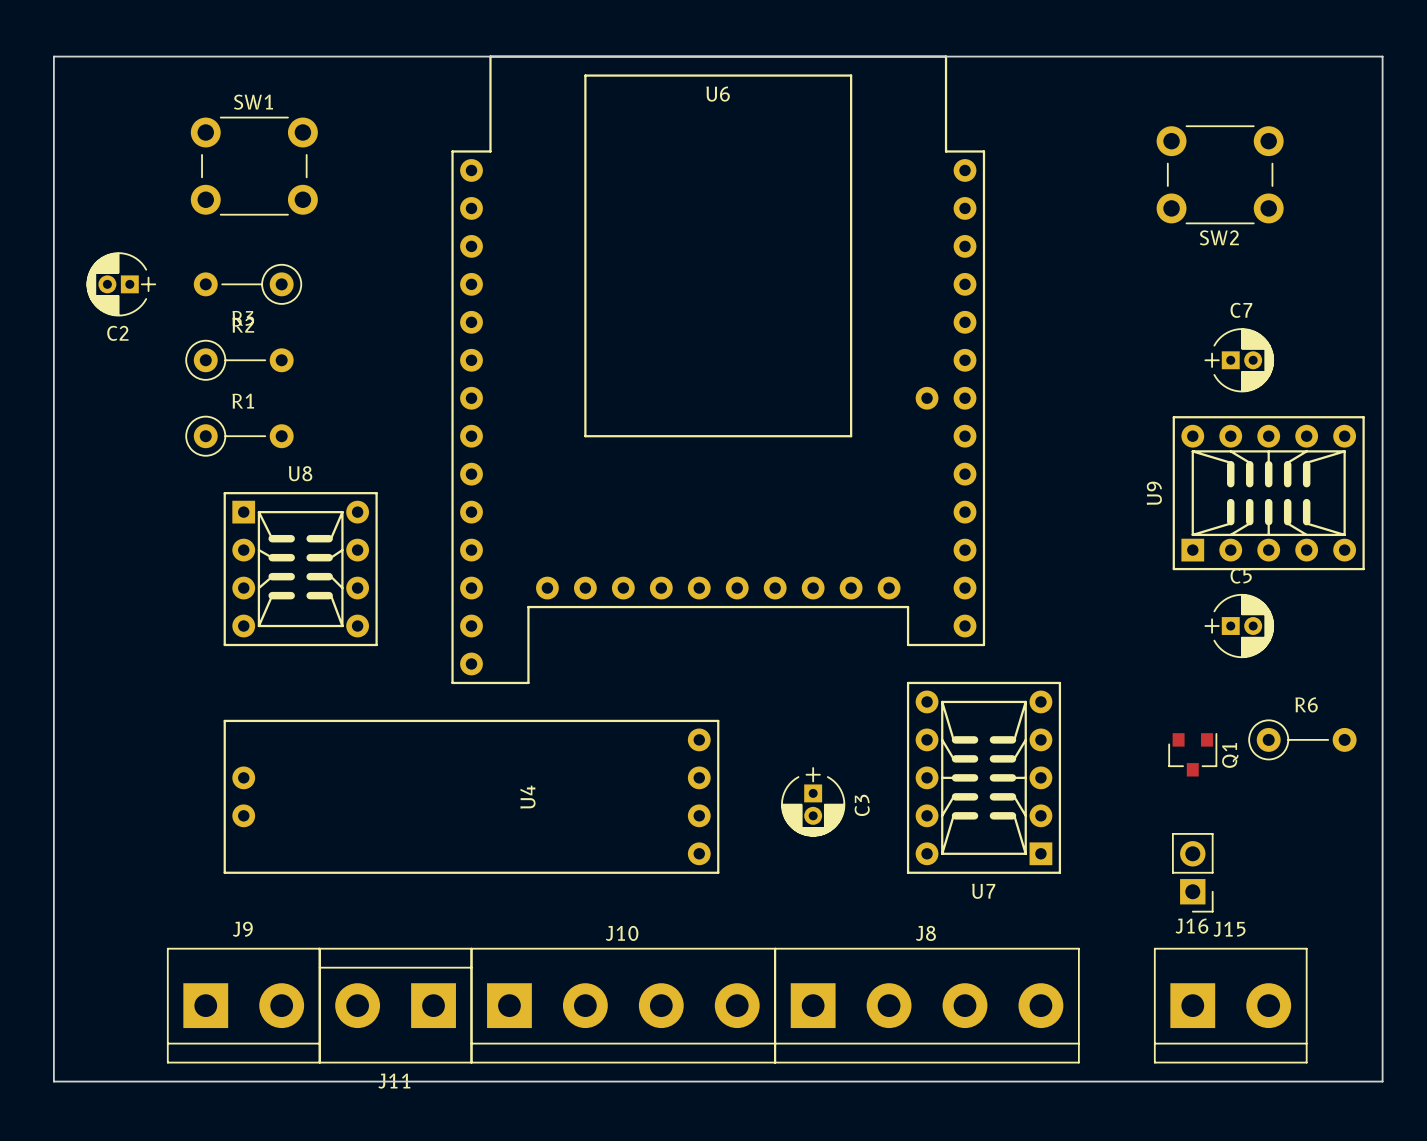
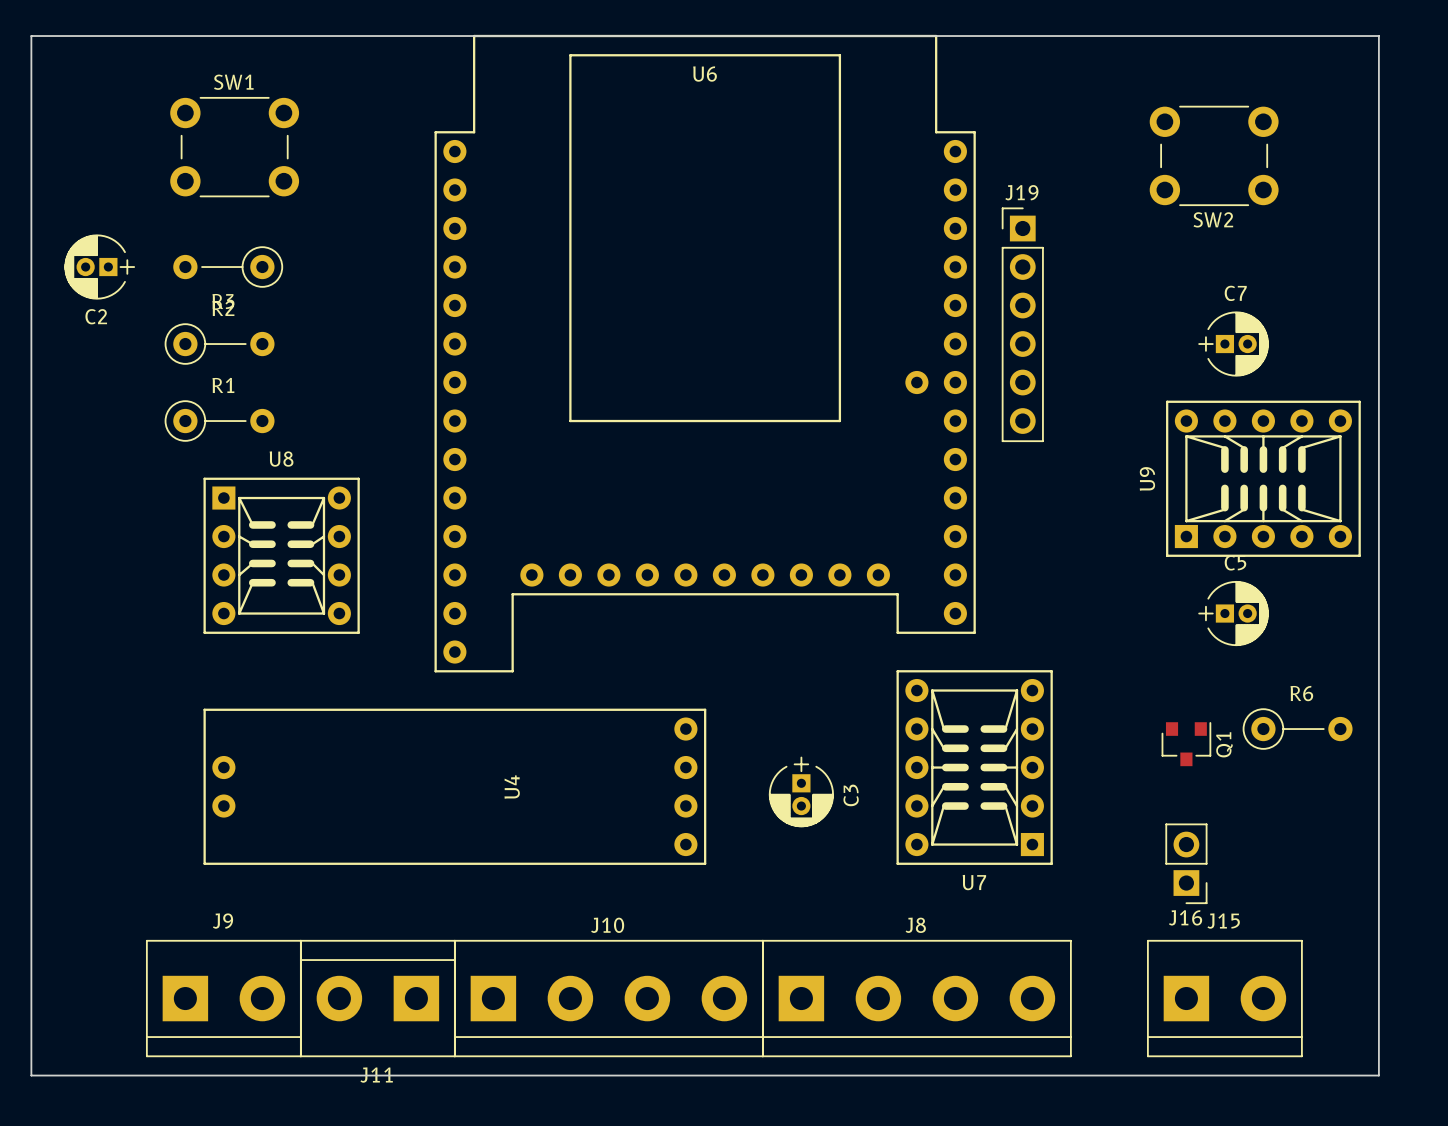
J19: none -> (1022, 324)

